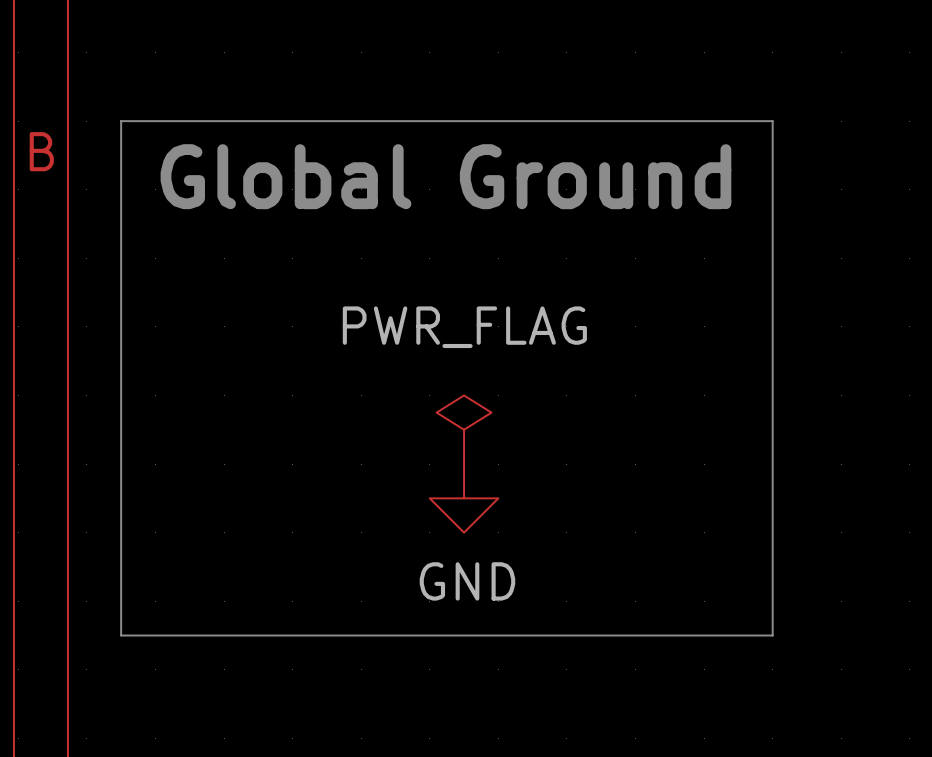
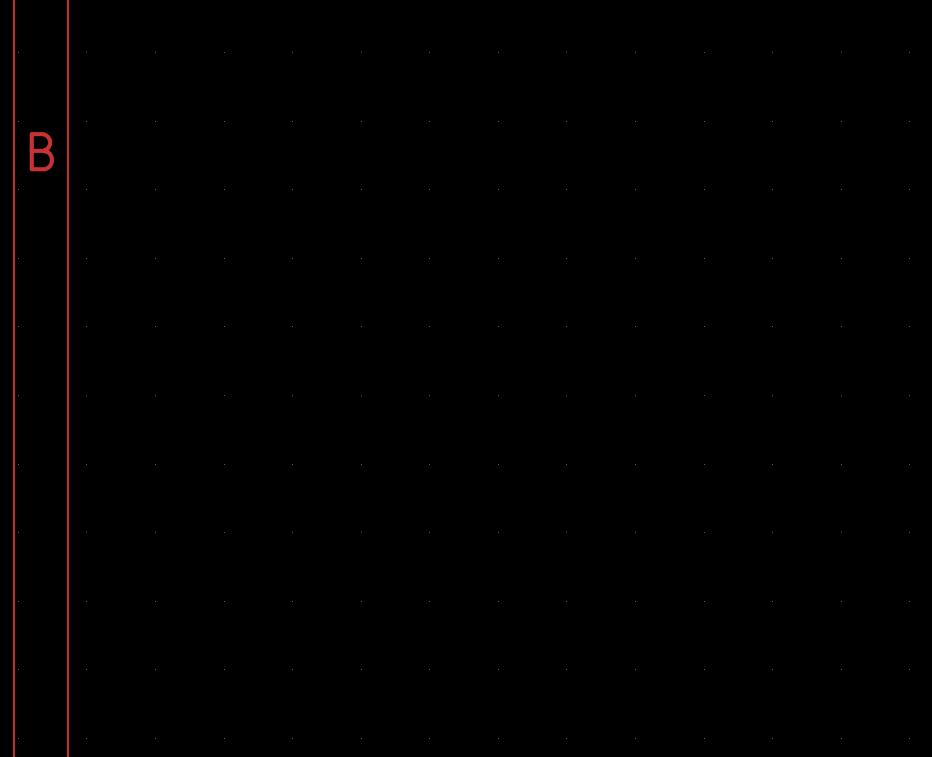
line: (121, 121) (772, 121) (772, 635) (121, 635) (121, 121) -> none
text: Global Ground (445, 176) -> none
power symbol: PWR_FLAG (464, 429) -> none
power symbol: GND (464, 498) -> none

